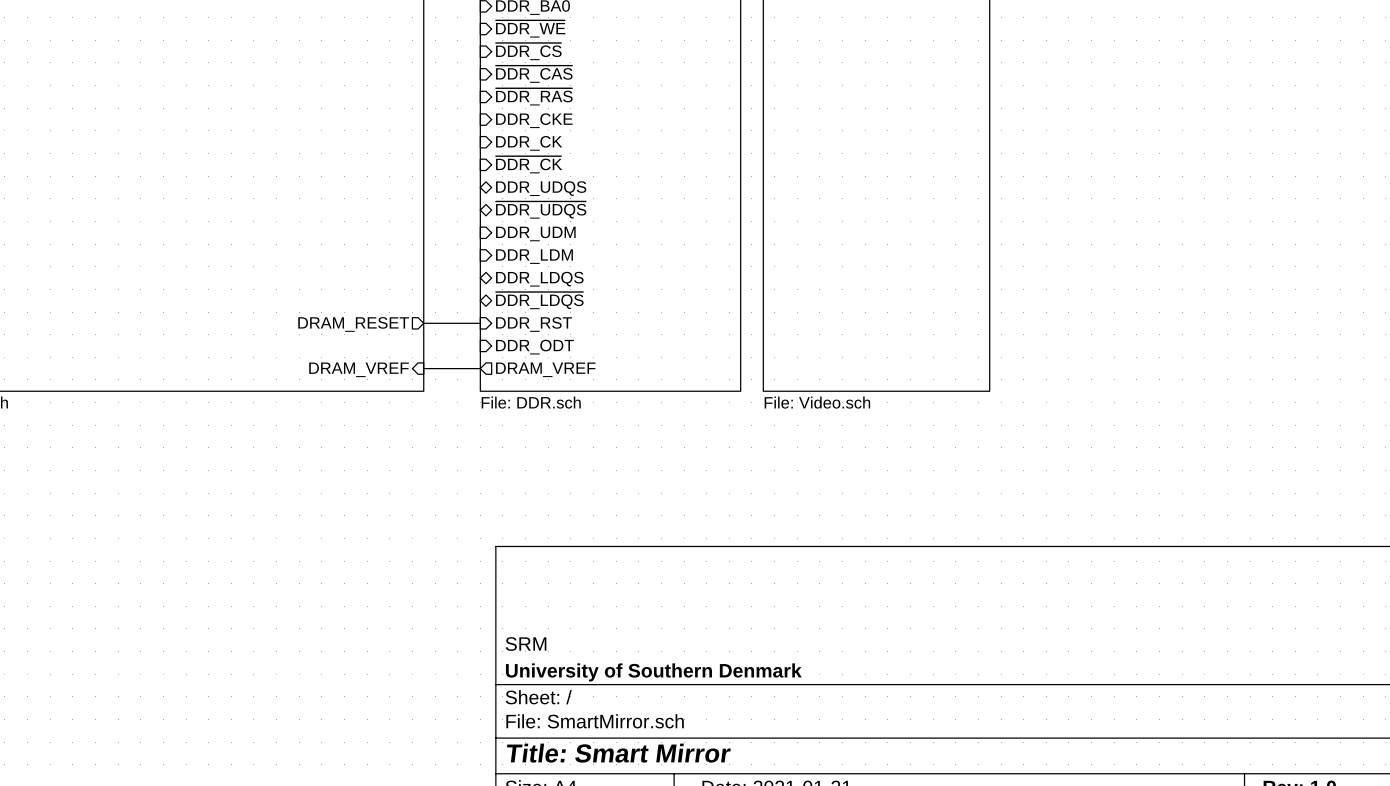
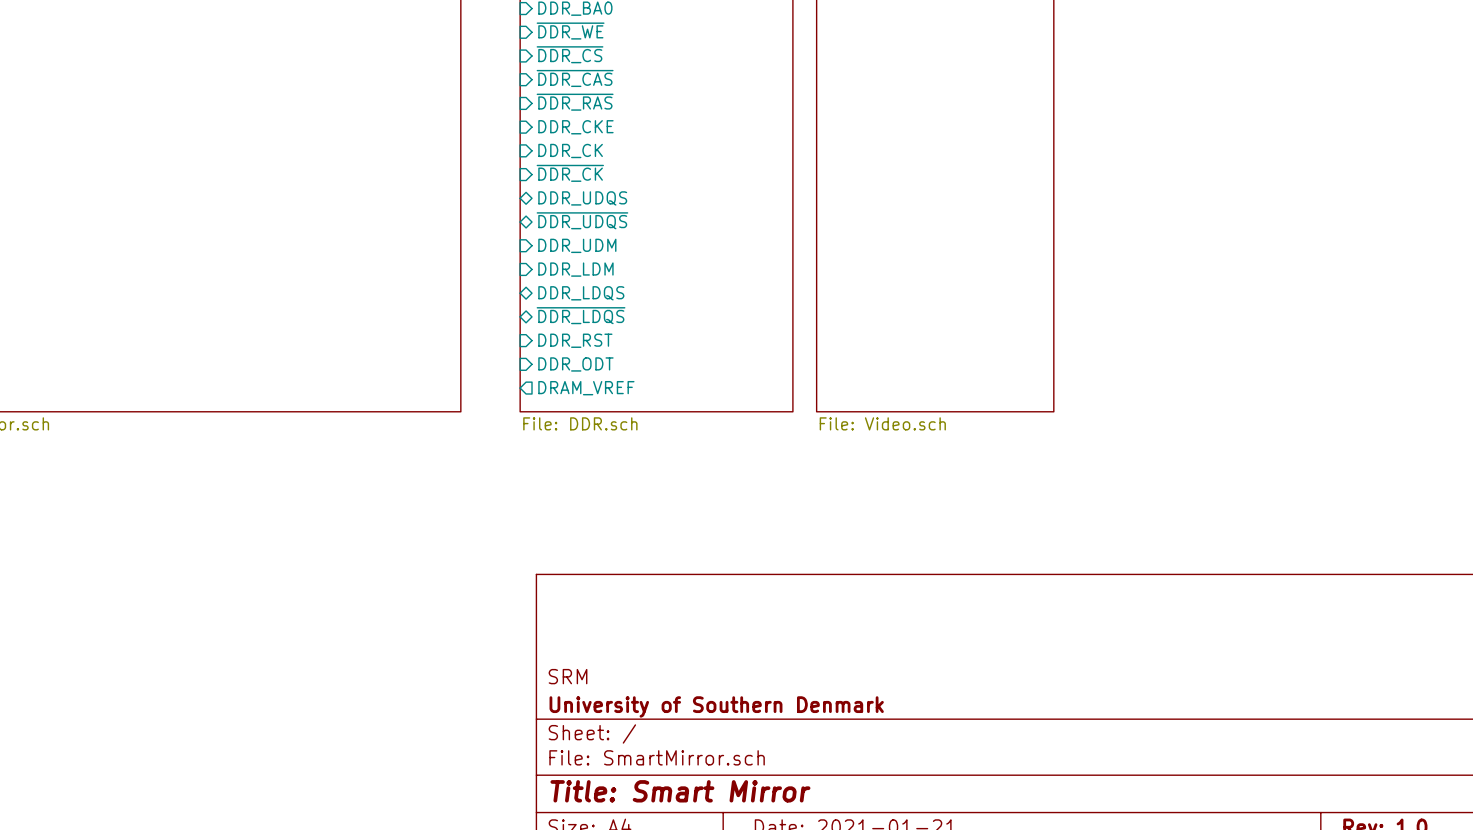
wire: (423, 323) (480, 323) -> none
sheet pin: DRAM_RESET (353, 324) -> none
wire: (423, 368) (480, 368) -> none
sheet pin: DRAM_VREF (358, 369) -> none

